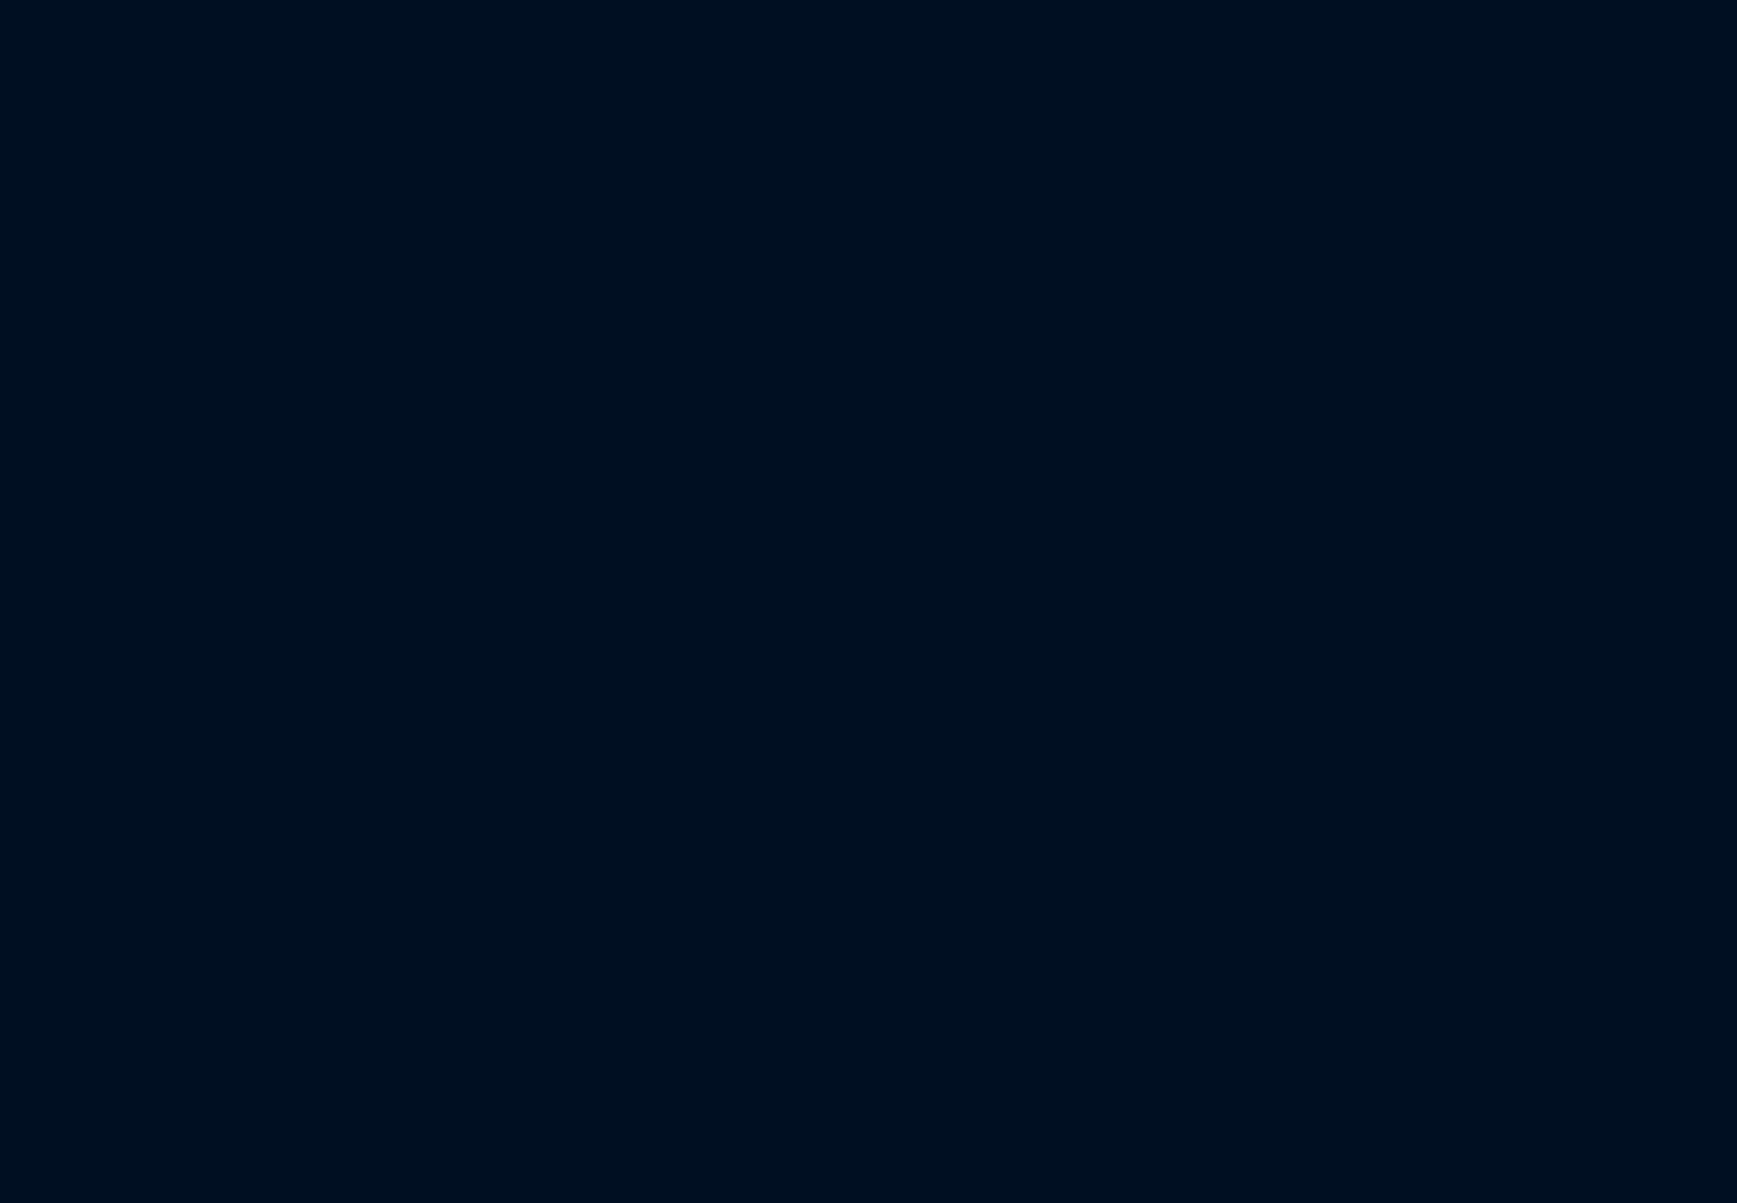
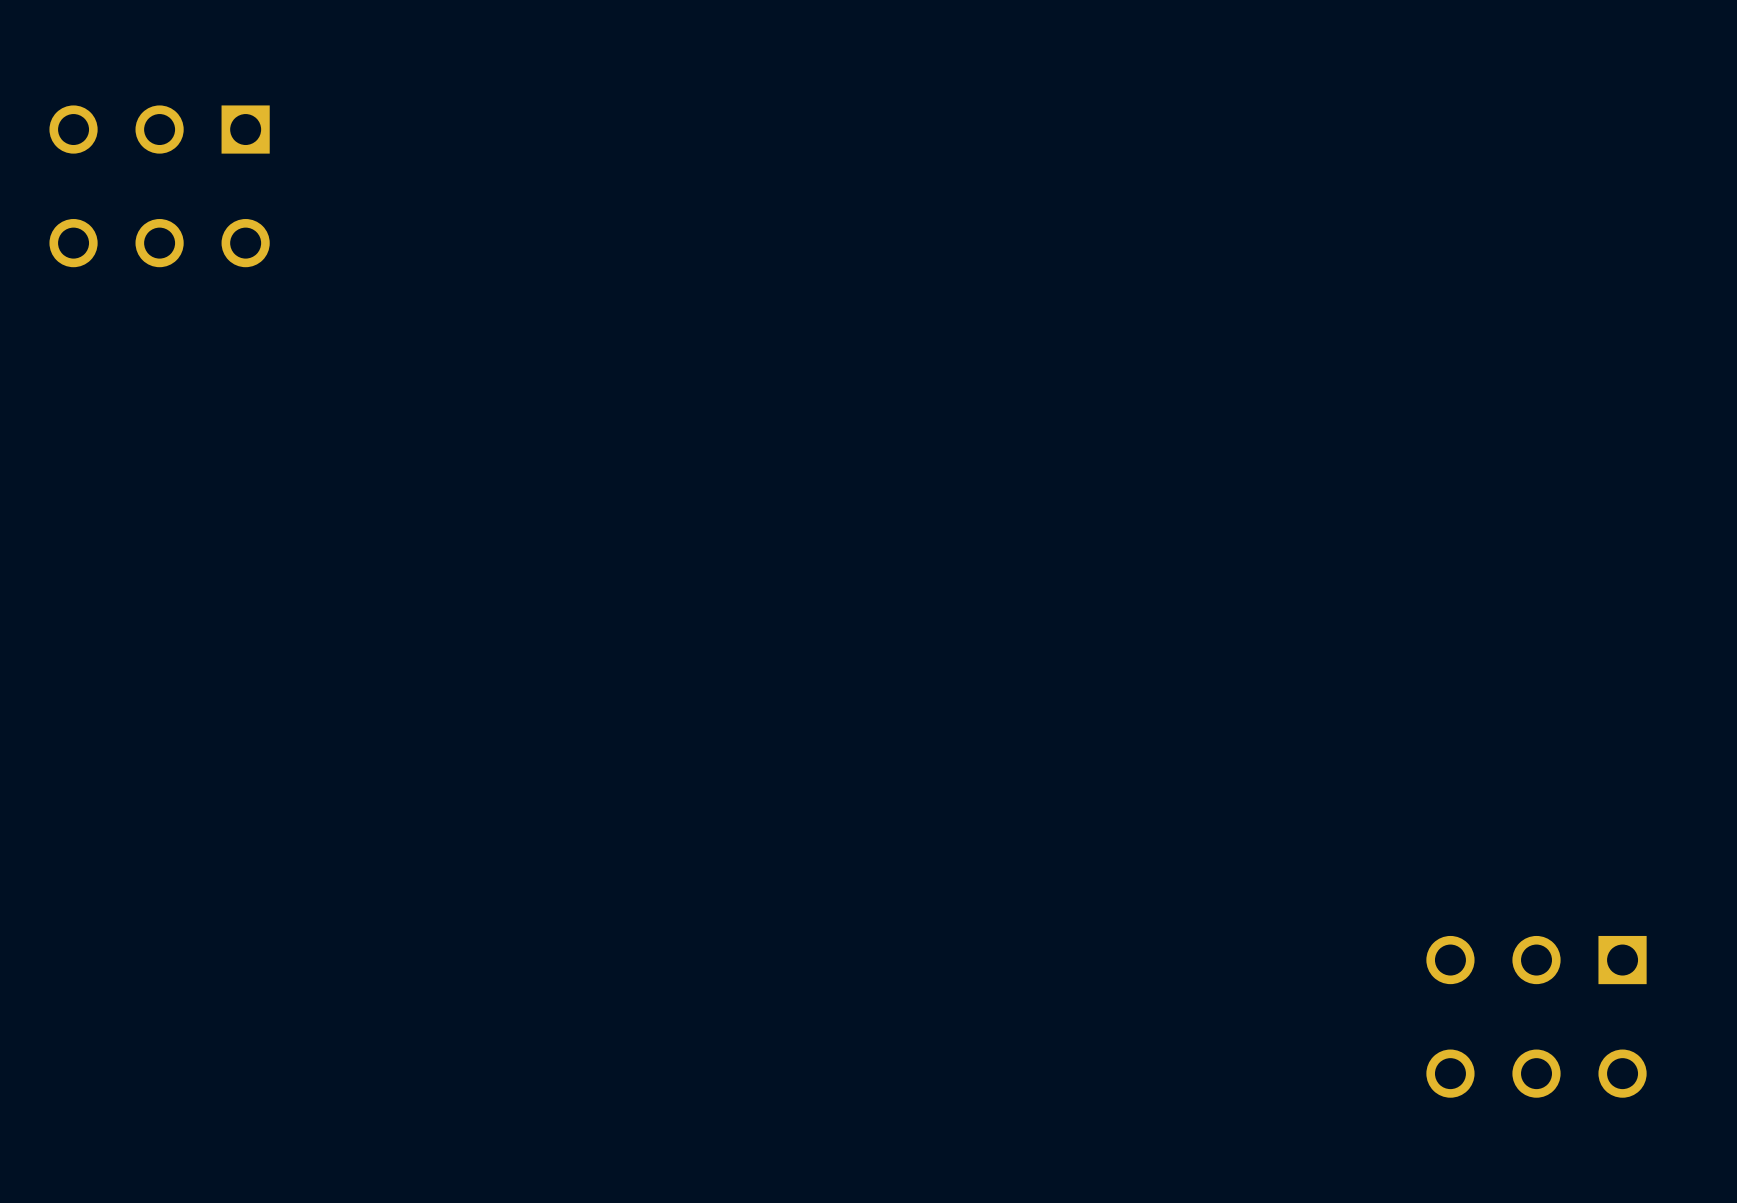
part: none -> (159, 186)
part: none -> (1536, 1016)

